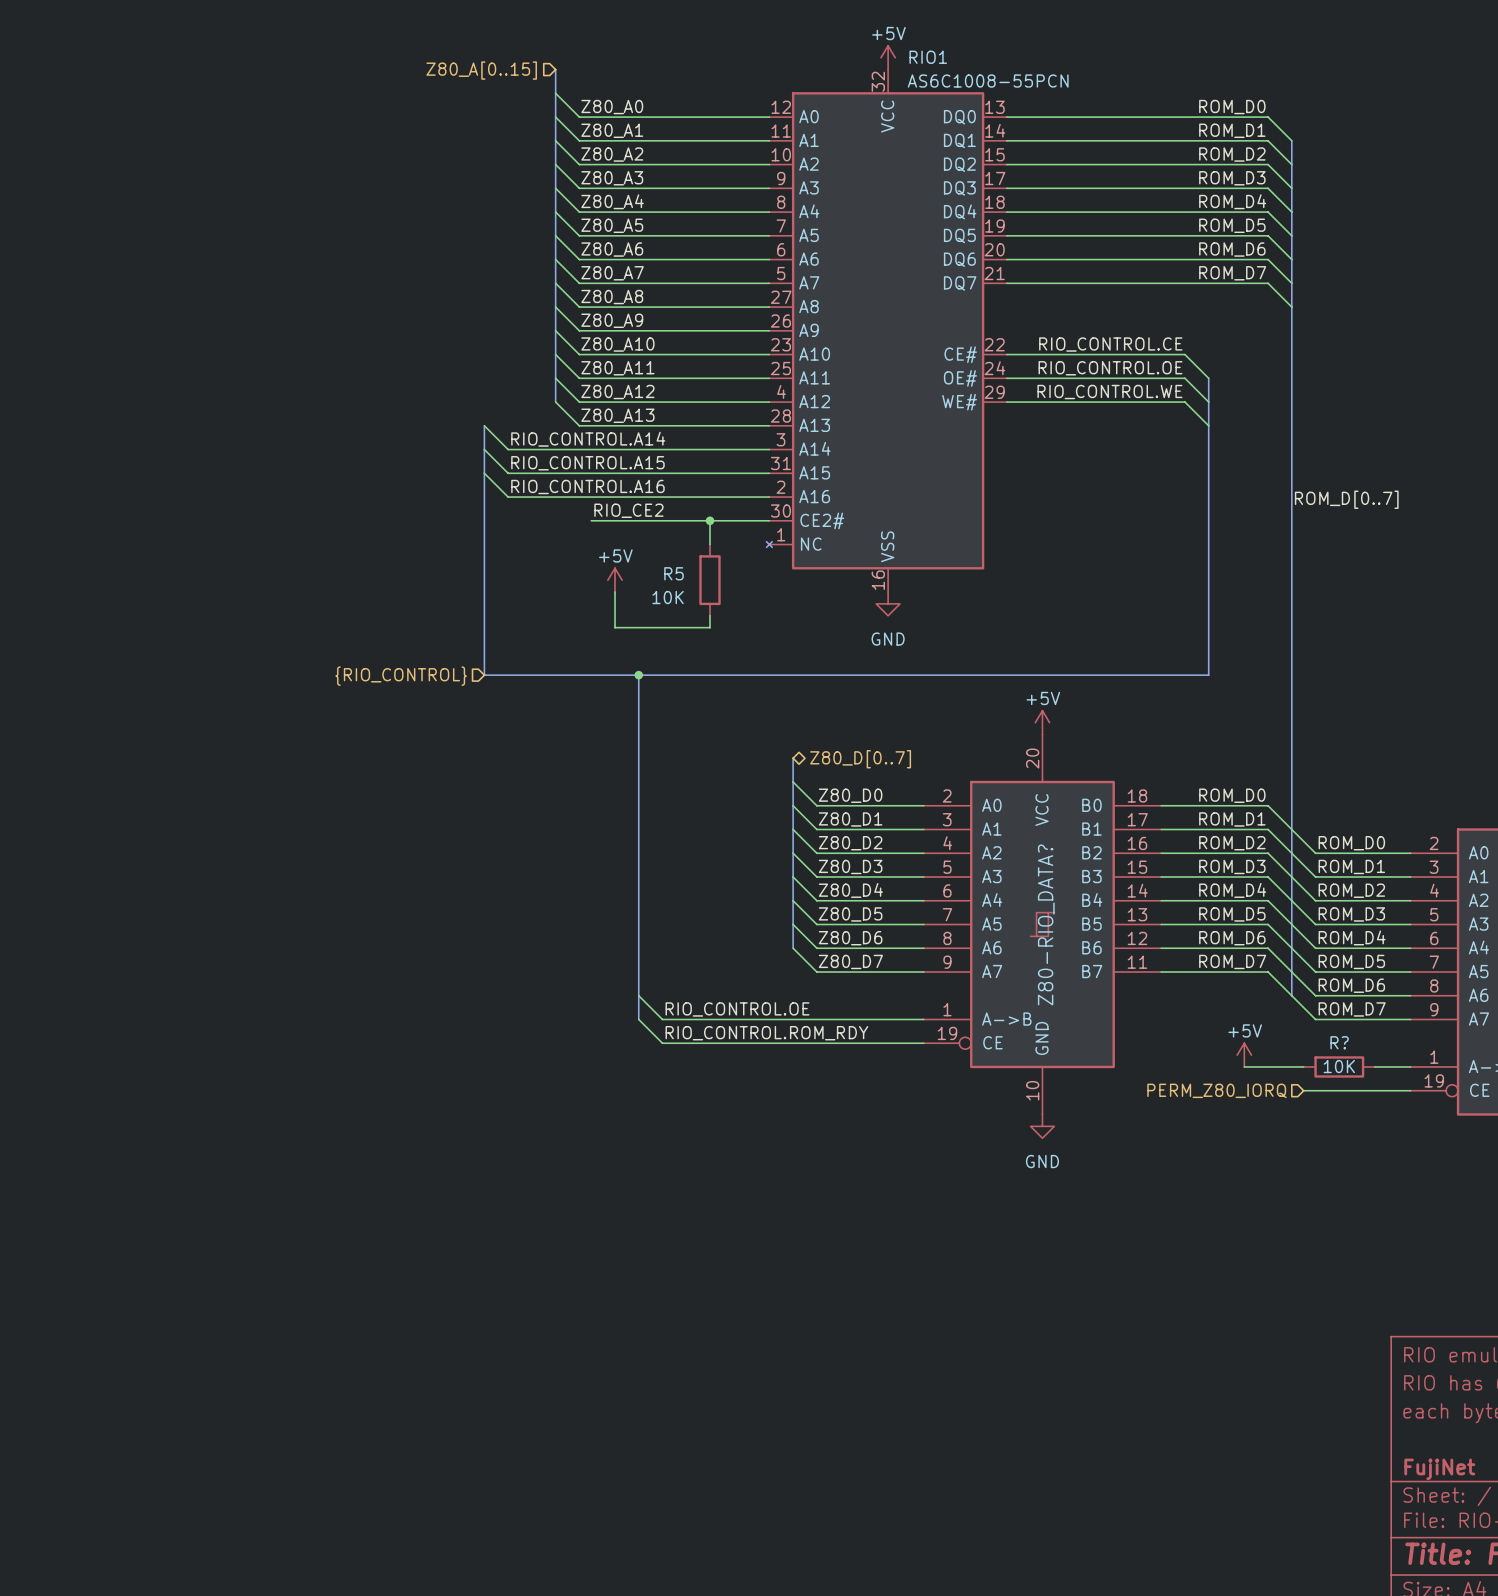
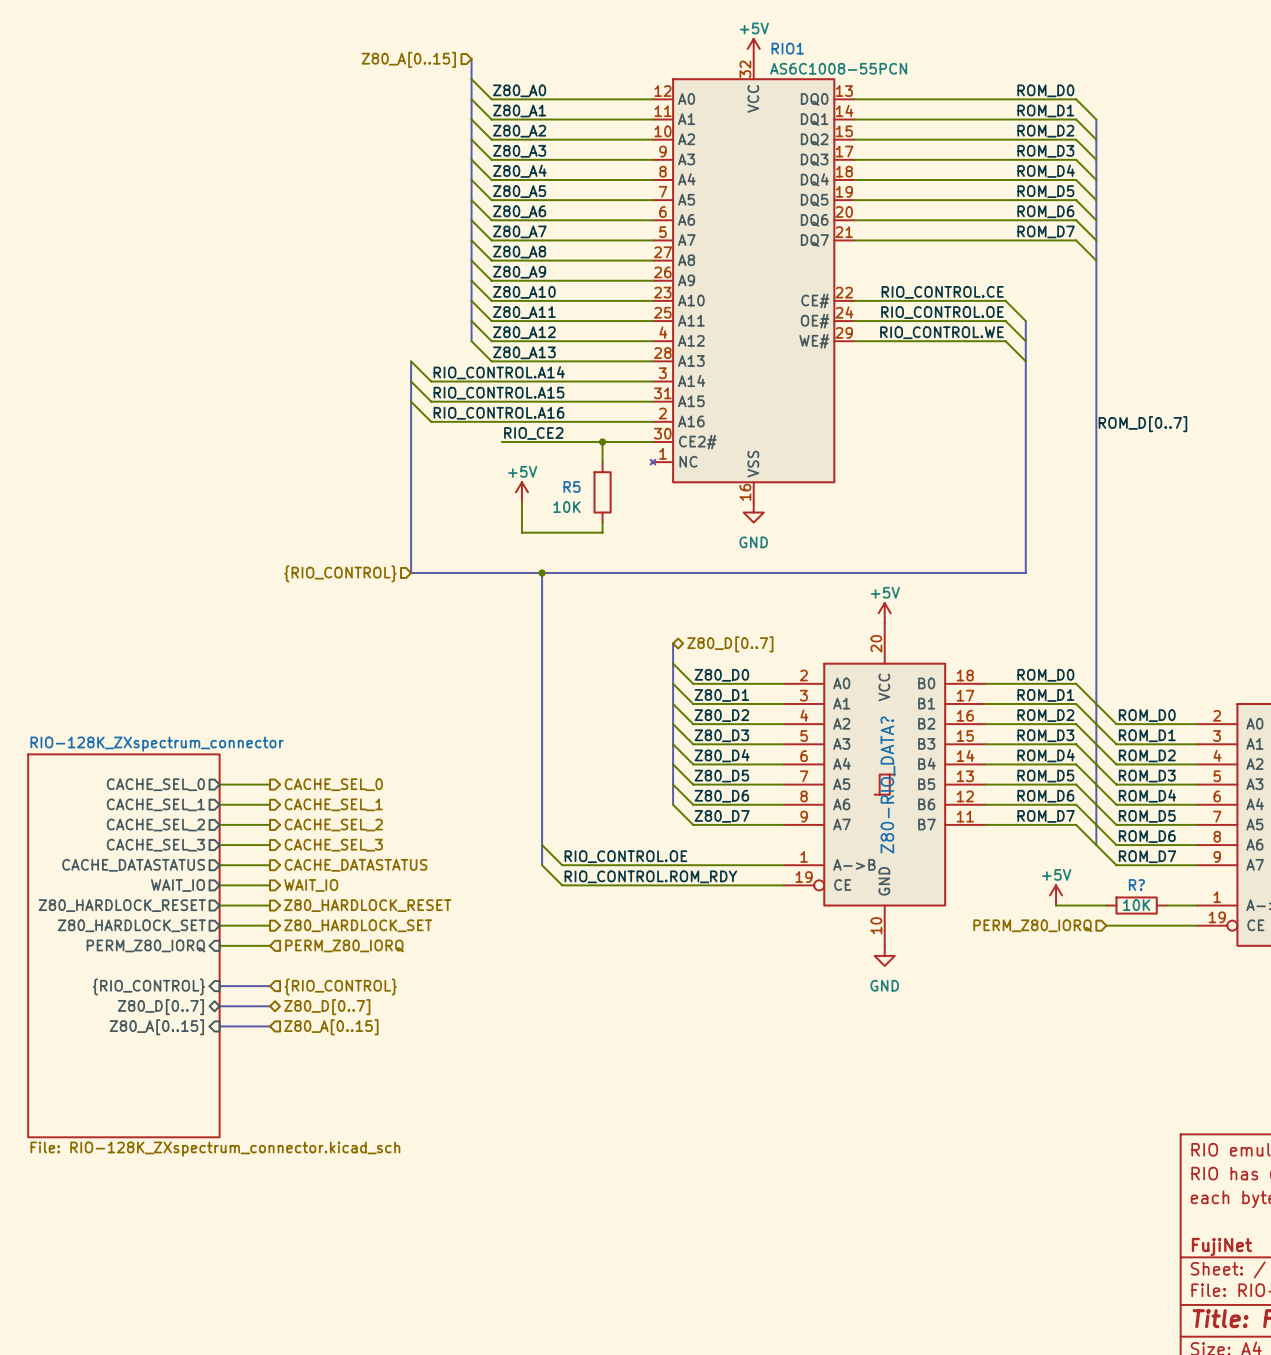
sheet pin: none -> CACHE_SEL_0 (155, 784)
wire: none -> (219, 784) (270, 784)
hierarchical label: none -> CACHE_SEL_0 (333, 784)
sheet pin: none -> CACHE_SEL_1 (155, 804)
wire: none -> (219, 804) (270, 804)
hierarchical label: none -> CACHE_SEL_1 (333, 804)
wire: none -> (219, 824) (270, 824)
sheet pin: none -> CACHE_SEL_2 (155, 825)
hierarchical label: none -> CACHE_SEL_2 (333, 825)
sheet pin: none -> CACHE_SEL_3 (155, 845)
wire: none -> (219, 845) (270, 845)
hierarchical label: none -> CACHE_SEL_3 (333, 845)
sheet pin: none -> CACHE_DATASTATUS (133, 865)
wire: none -> (219, 865) (270, 865)
hierarchical label: none -> CACHE_DATASTATUS (356, 865)
sheet pin: none -> WAIT_IO (177, 885)
wire: none -> (219, 885) (270, 885)
hierarchical label: none -> WAIT_IO (311, 885)
wire: none -> (219, 905) (270, 905)
sheet pin: none -> Z80_HARDLOCK_RESET (122, 905)
hierarchical label: none -> Z80_HARDLOCK_RESET (367, 905)
sheet pin: none -> Z80_HARDLOCK_SET (131, 925)
wire: none -> (219, 925) (270, 925)
hierarchical label: none -> Z80_HARDLOCK_SET (358, 925)
sheet RIO-128K_ZXspectrum_connector: none -> File: RIO-128K_ZXspectrum_connector.kicad_sch (123, 945)
sheet pin: none -> PERM_Z80_IORQ (146, 945)
wire: none -> (219, 945) (270, 945)
hierarchical label: none -> PERM_Z80_IORQ (344, 945)
bus: none -> (219, 986) (270, 986)
sheet pin: none -> {RIO_CONTROL} (148, 986)
hierarchical label: none -> {RIO_CONTROL} (340, 986)
bus: none -> (219, 1006) (270, 1006)
sheet pin: none -> Z80_D[0..7] (160, 1007)
hierarchical label: none -> Z80_D[0..7] (327, 1007)
bus: none -> (219, 1026) (270, 1026)
sheet pin: none -> Z80_A[0..15] (156, 1027)
hierarchical label: none -> Z80_A[0..15] (331, 1027)

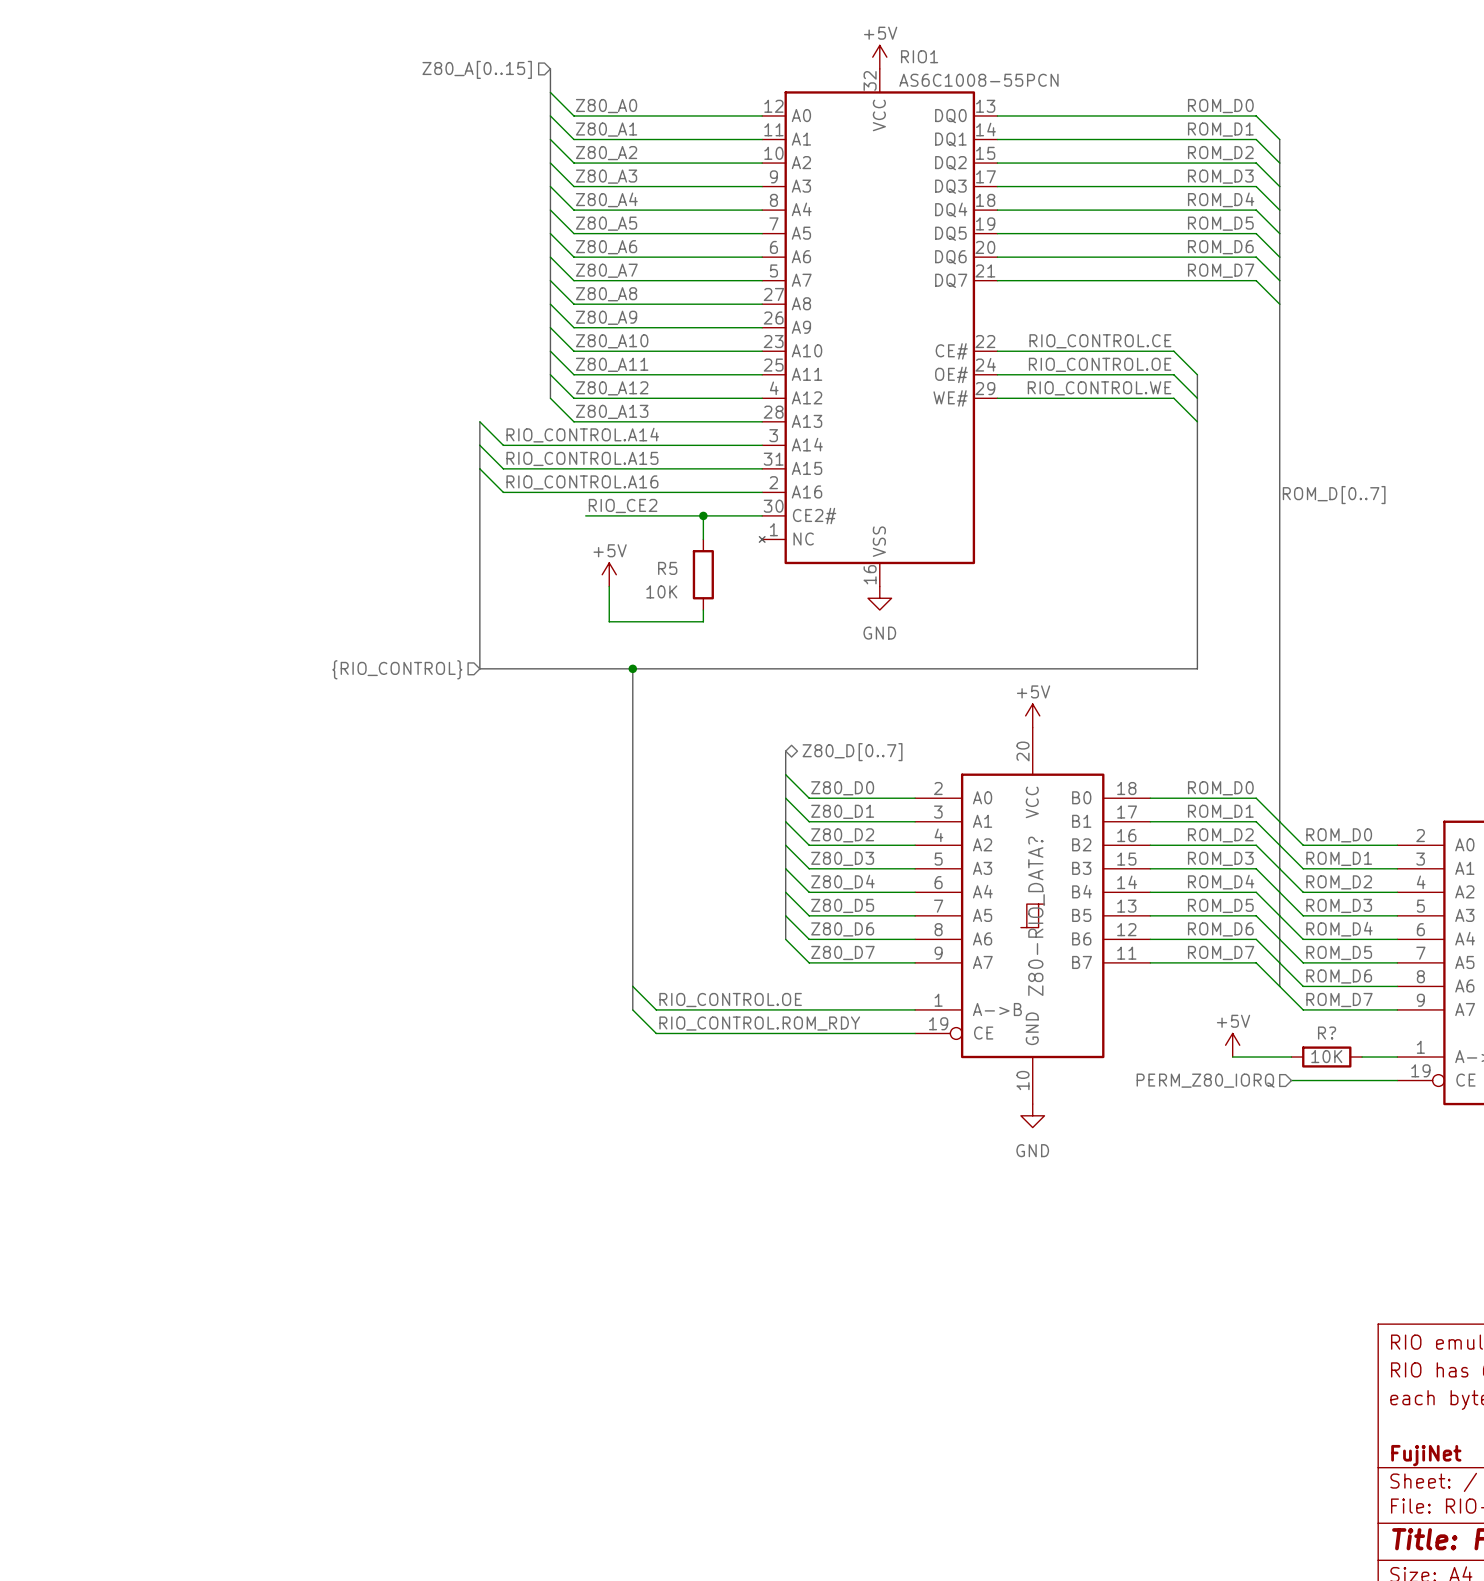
sheet pin: CACHE_SEL_0 (155, 784) -> none
wire: (219, 784) (270, 784) -> none
hierarchical label: CACHE_SEL_0 (333, 784) -> none
sheet pin: CACHE_SEL_1 (155, 804) -> none
wire: (219, 804) (270, 804) -> none
hierarchical label: CACHE_SEL_1 (333, 804) -> none
wire: (219, 824) (270, 824) -> none
sheet pin: CACHE_SEL_2 (155, 825) -> none
hierarchical label: CACHE_SEL_2 (333, 825) -> none
sheet pin: CACHE_SEL_3 (155, 845) -> none
wire: (219, 845) (270, 845) -> none
hierarchical label: CACHE_SEL_3 (333, 845) -> none
sheet pin: CACHE_DATASTATUS (133, 865) -> none
wire: (219, 865) (270, 865) -> none
hierarchical label: CACHE_DATASTATUS (356, 865) -> none
sheet pin: WAIT_IO (177, 885) -> none
wire: (219, 885) (270, 885) -> none
hierarchical label: WAIT_IO (311, 885) -> none
sheet pin: Z80_HARDLOCK_RESET (122, 905) -> none
wire: (219, 905) (270, 905) -> none
hierarchical label: Z80_HARDLOCK_RESET (367, 905) -> none
sheet pin: Z80_HARDLOCK_SET (131, 925) -> none
wire: (219, 925) (270, 925) -> none
hierarchical label: Z80_HARDLOCK_SET (358, 925) -> none
sheet RIO-128K_ZXspectrum_connector: File: RIO-128K_ZXspectrum_connector.kicad_sch (123, 945) -> none
sheet pin: PERM_Z80_IORQ (146, 945) -> none
wire: (219, 945) (270, 945) -> none
hierarchical label: PERM_Z80_IORQ (344, 945) -> none
sheet pin: {RIO_CONTROL} (148, 986) -> none
bus: (219, 986) (270, 986) -> none
hierarchical label: {RIO_CONTROL} (340, 986) -> none
bus: (219, 1006) (270, 1006) -> none
sheet pin: Z80_D[0..7] (160, 1007) -> none
hierarchical label: Z80_D[0..7] (327, 1007) -> none
bus: (219, 1026) (270, 1026) -> none
sheet pin: Z80_A[0..15] (156, 1027) -> none
hierarchical label: Z80_A[0..15] (331, 1027) -> none

